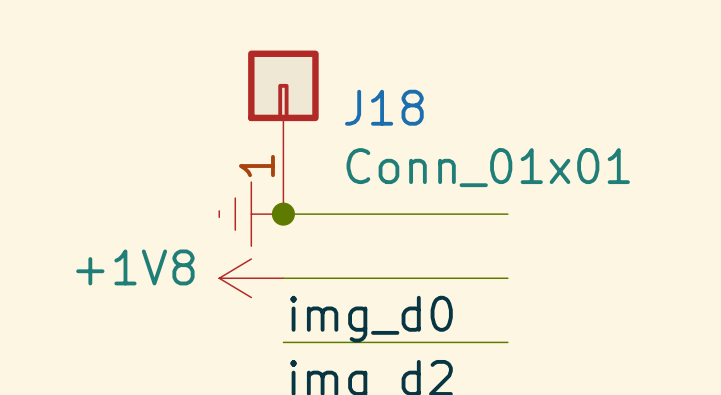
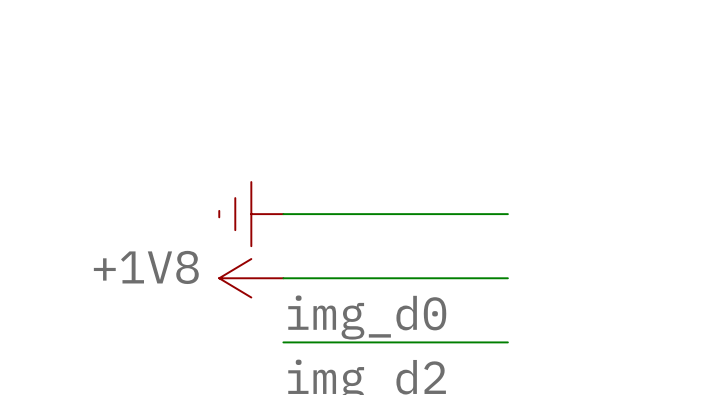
J18: Conn_01x01 (283, 132) -> none
junction: (283, 214) -> none

